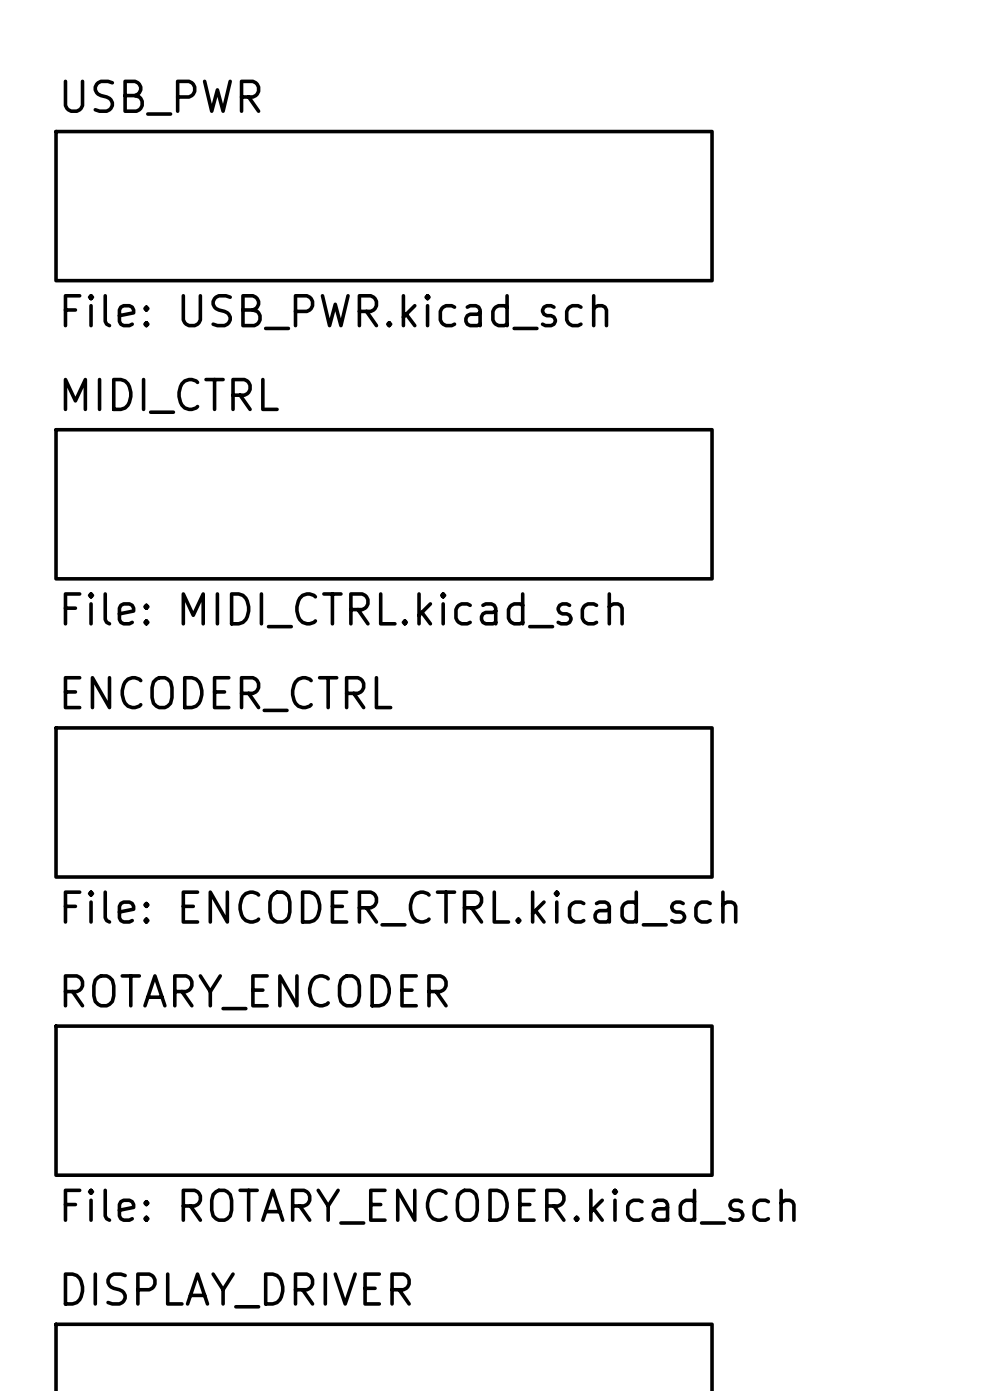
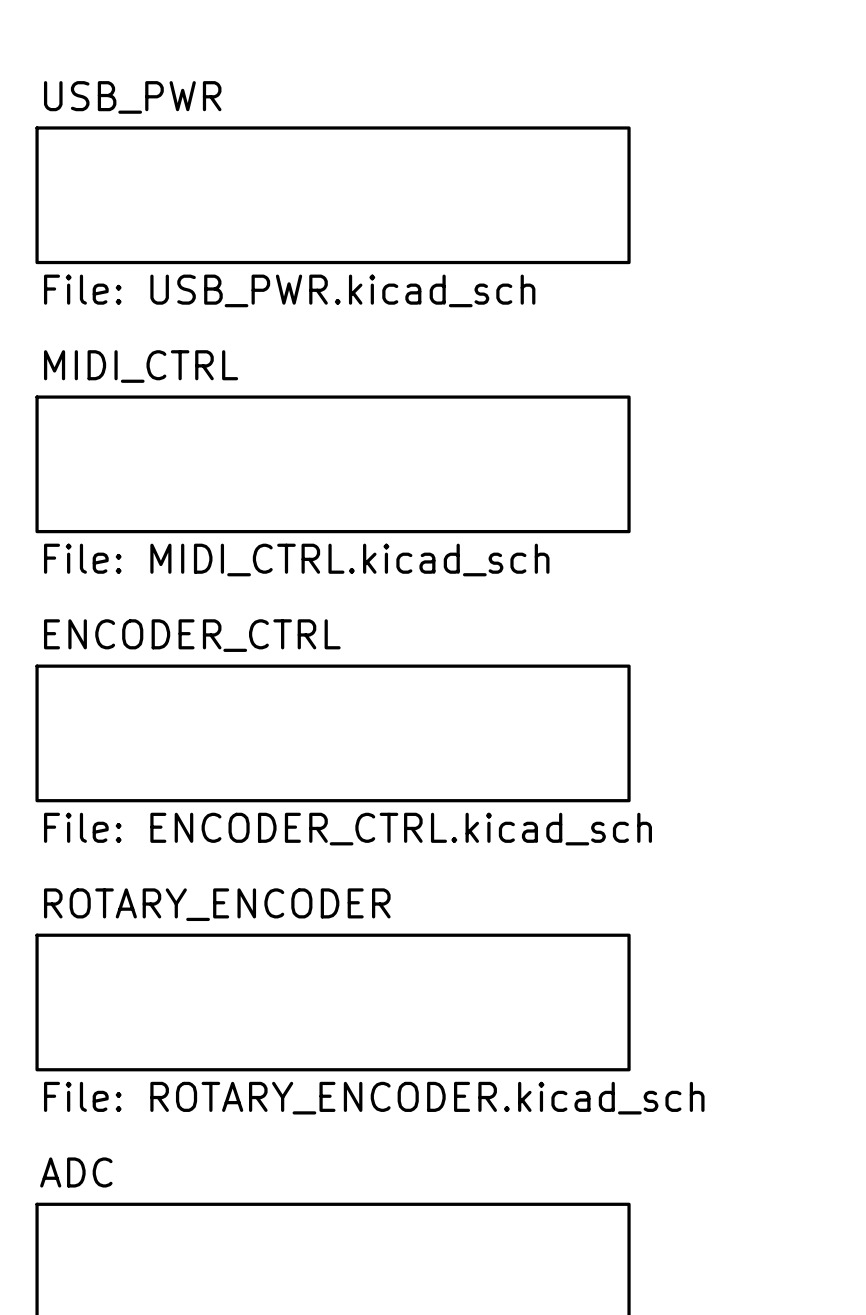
sheet DISPLAY_DRIVER name: DISPLAY_DRIVER (237, 1290) -> ADC (76, 1172)

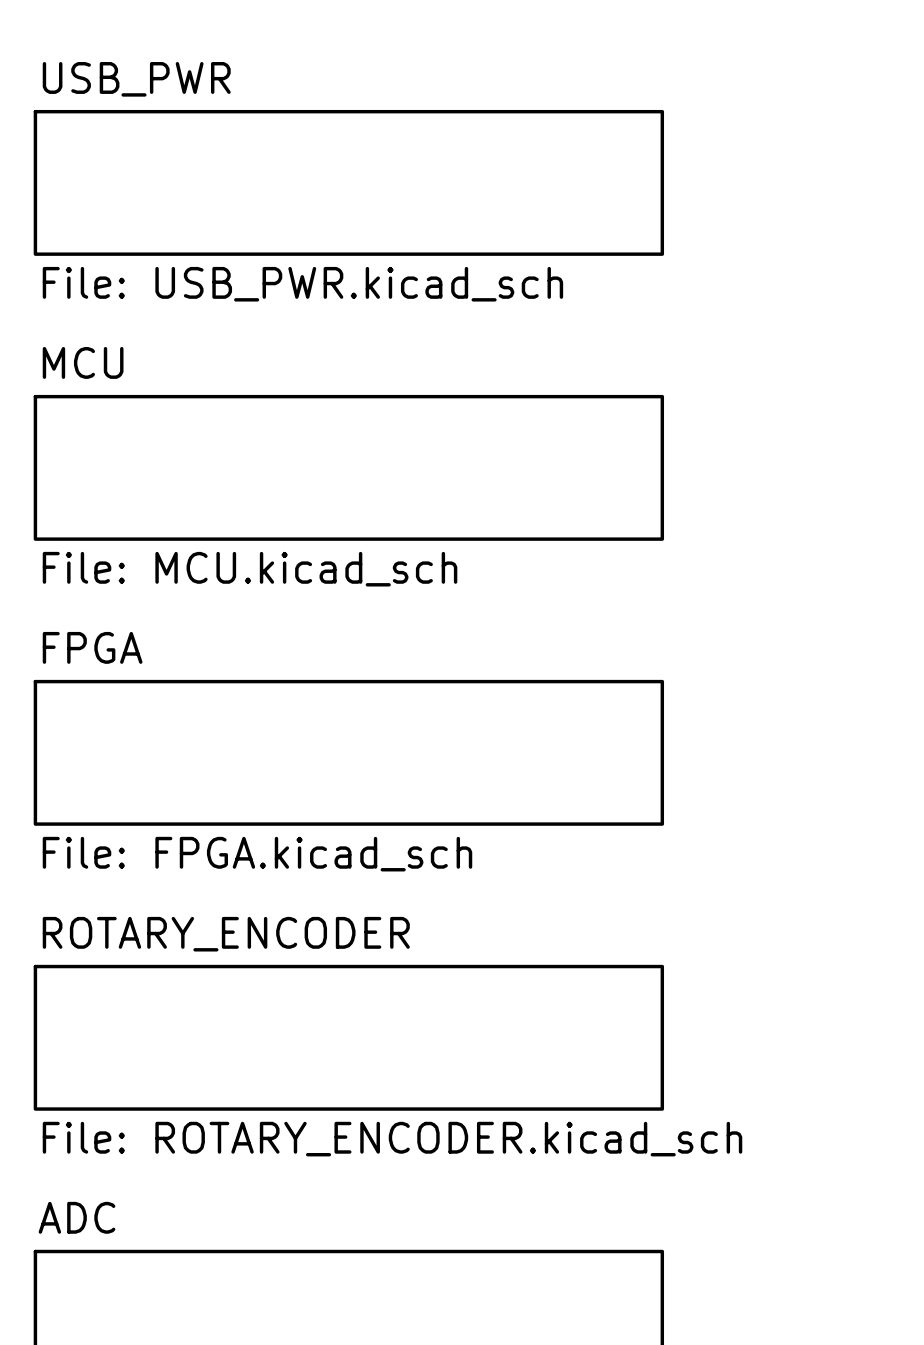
sheet MIDI_CTRL name: MIDI_CTRL (141, 366) -> MCU (83, 362)
sheet MIDI_CTRL value: File: MIDI_CTRL.kicad_sch (296, 560) -> File: MCU.kicad_sch (250, 569)
sheet ENCODER_CTRL name: ENCODER_CTRL (192, 635) -> FPGA (92, 647)
sheet ENCODER_CTRL value: File: ENCODER_CTRL.kicad_sch (347, 829) -> File: FPGA.kicad_sch (257, 854)

